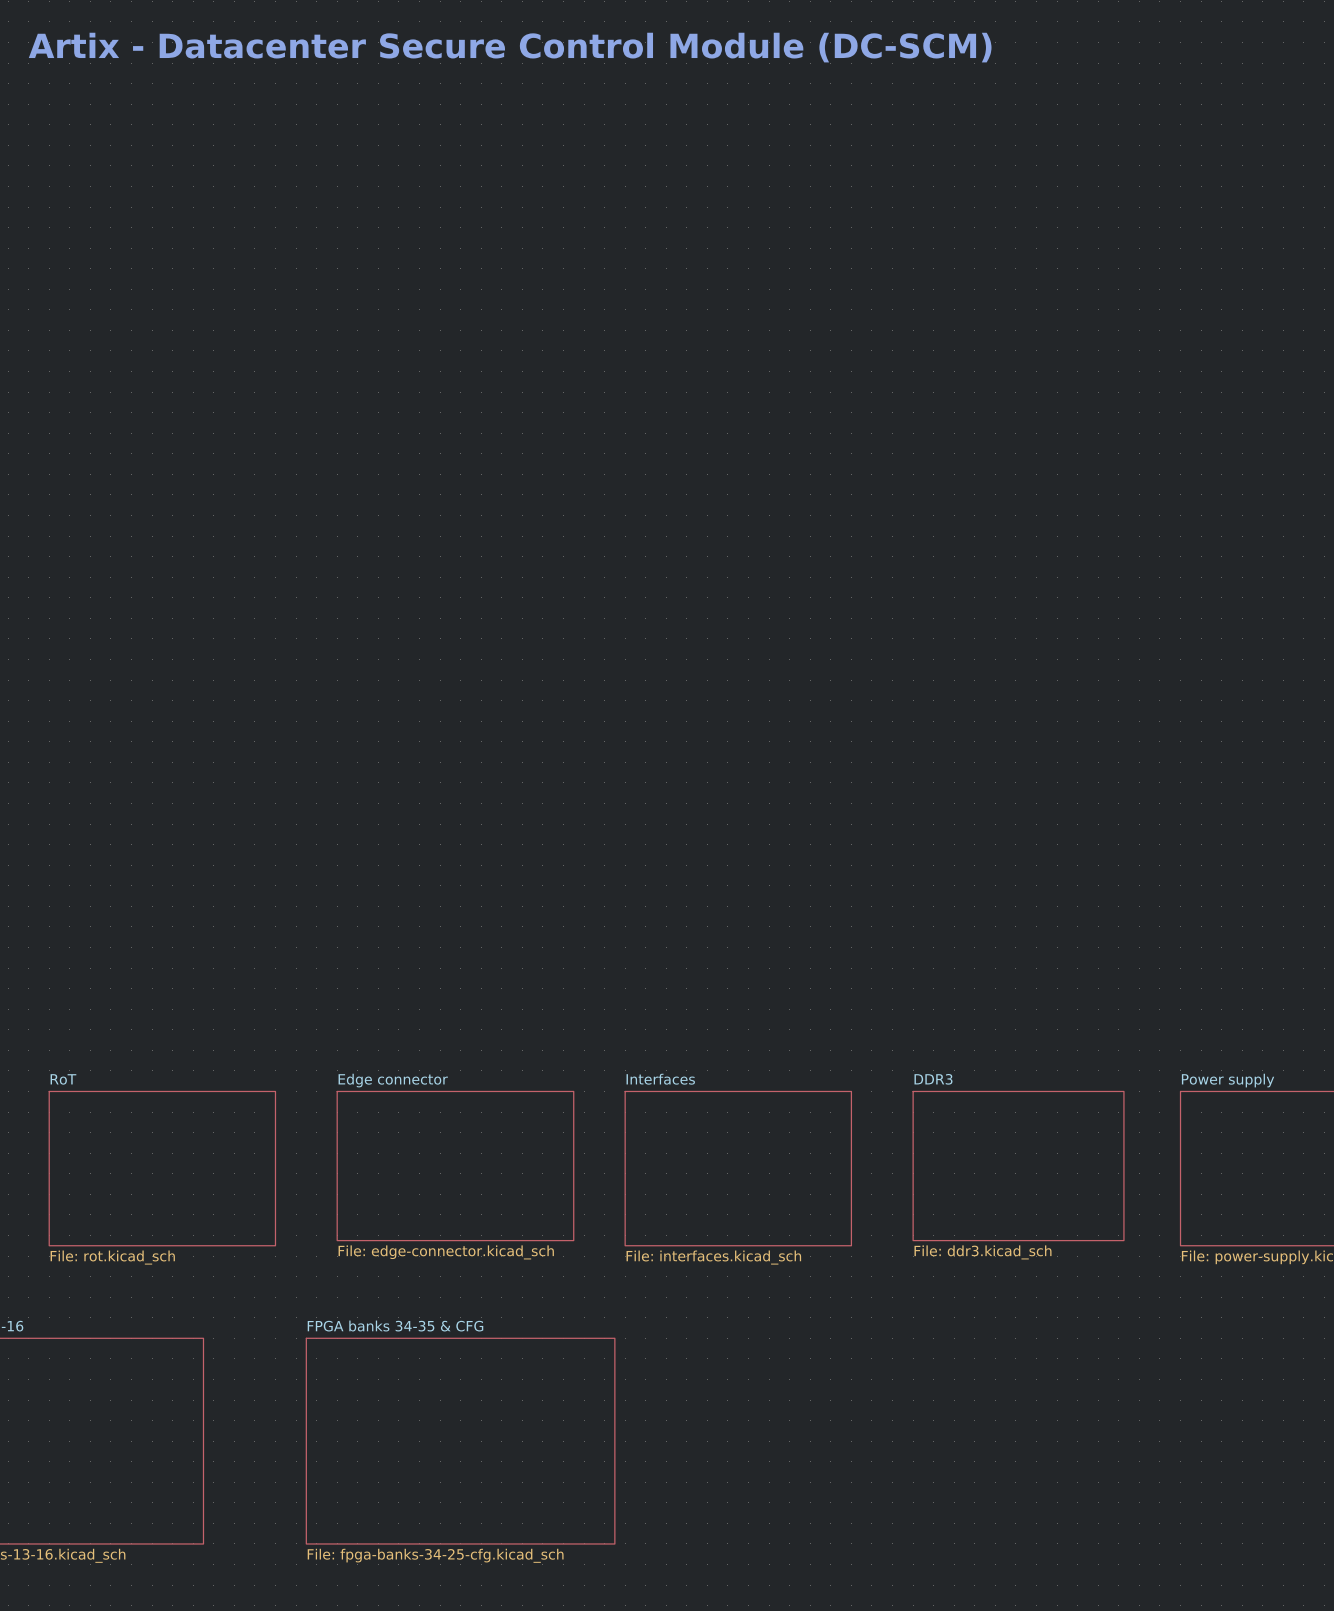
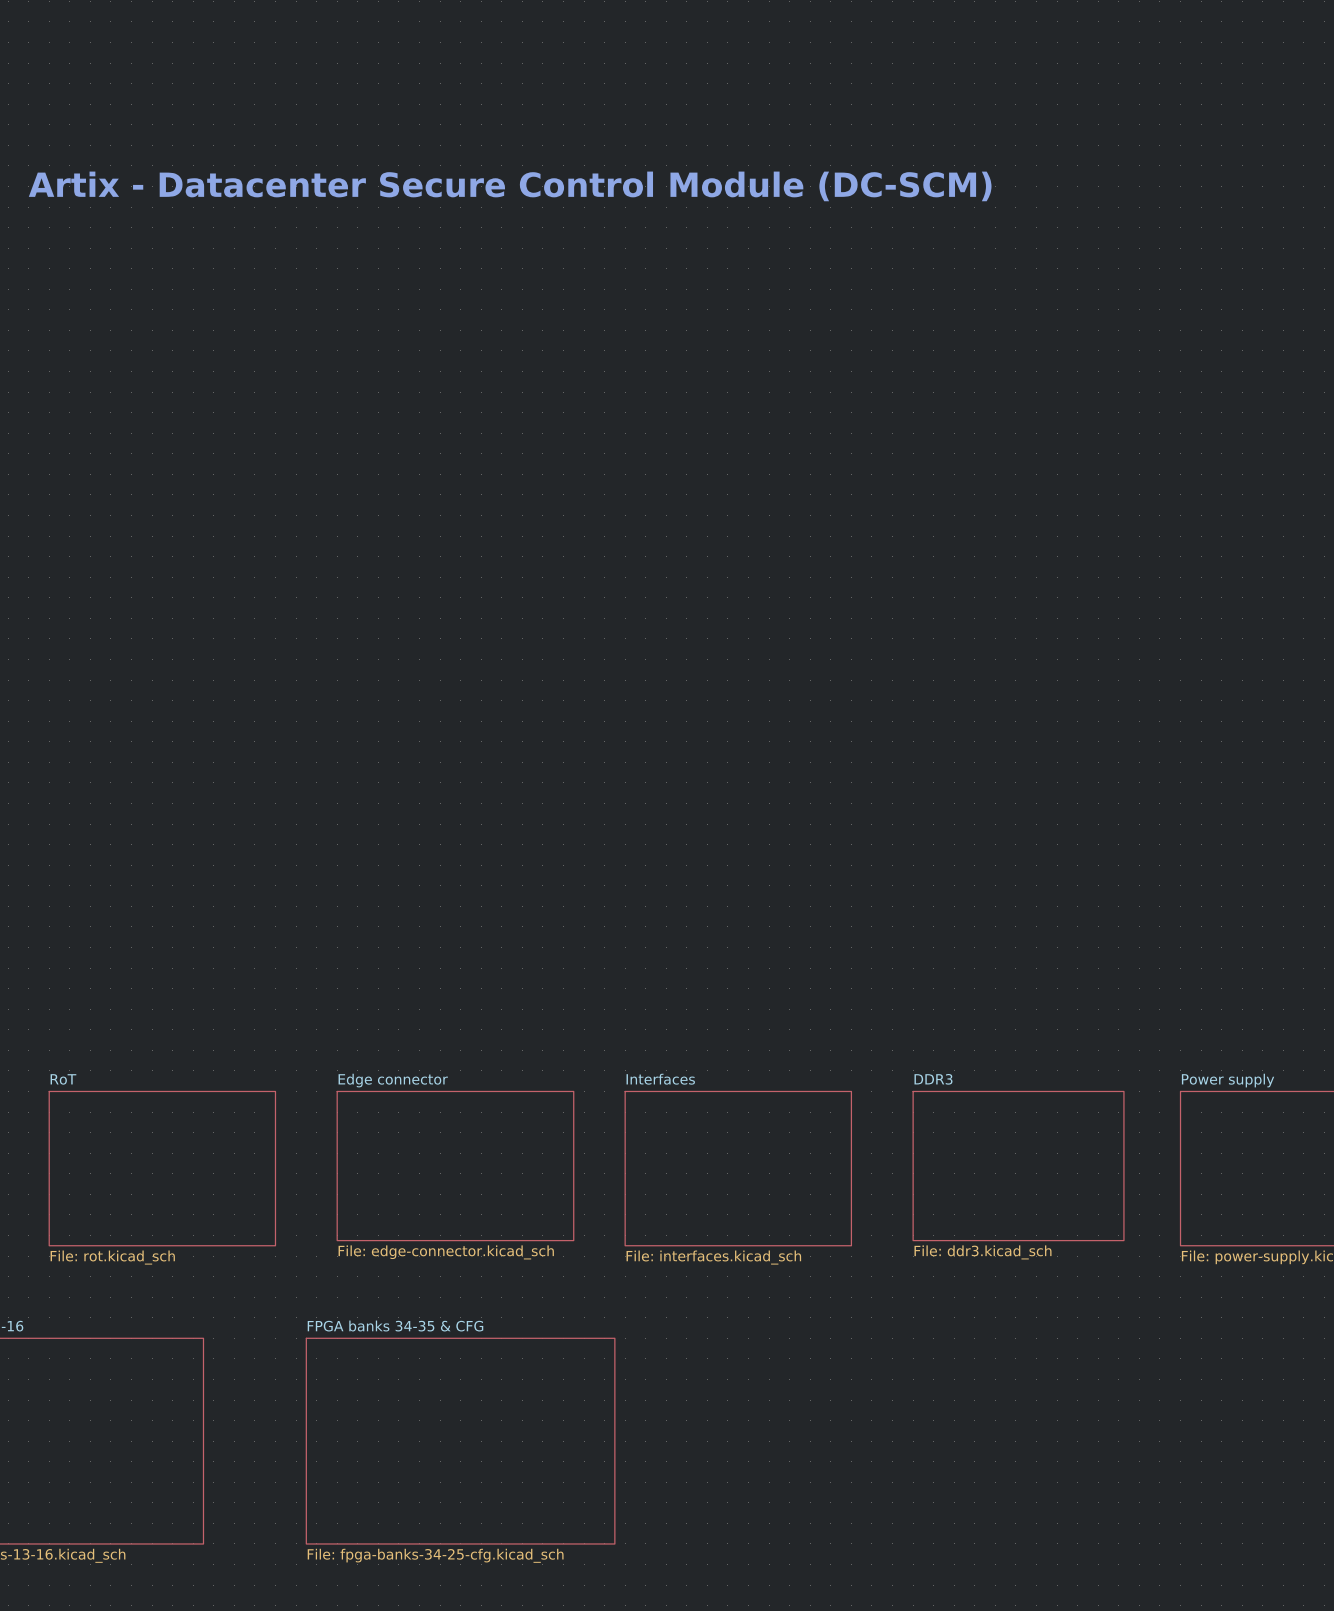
text position: Artix - Datacenter Secure Control Module (DC-SCM) (510, 47) -> Artix - Datacenter Secure Control Module (DC-SCM) (510, 186)

